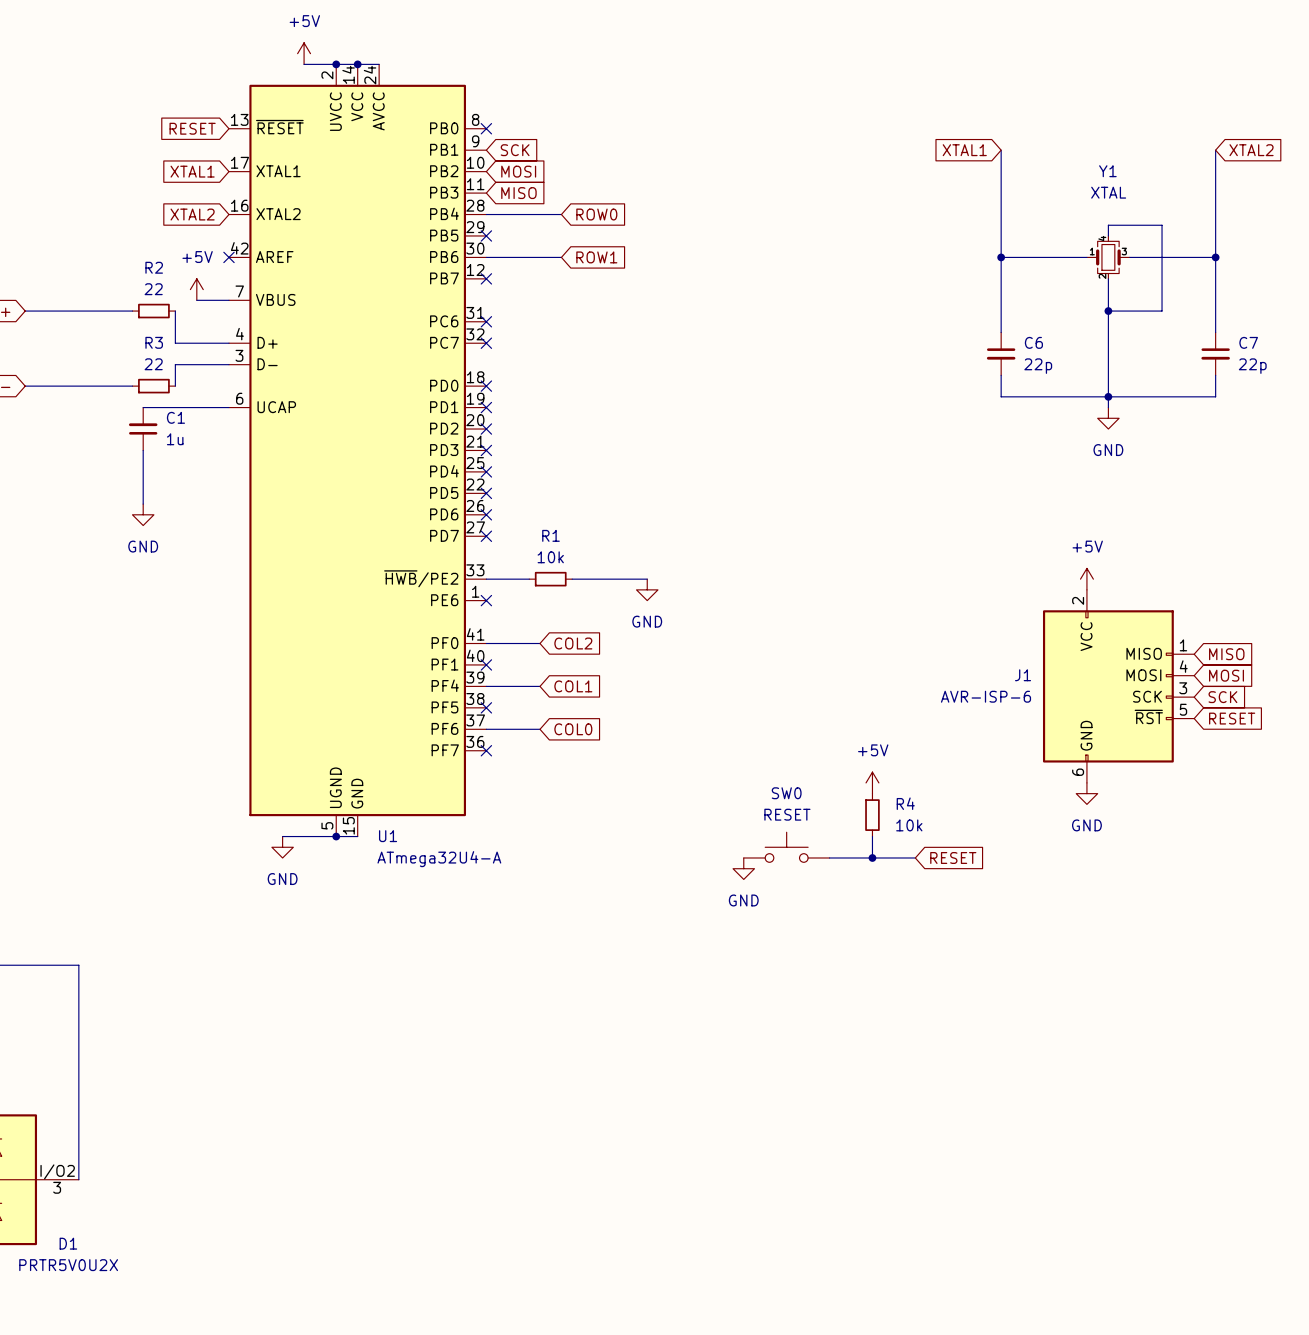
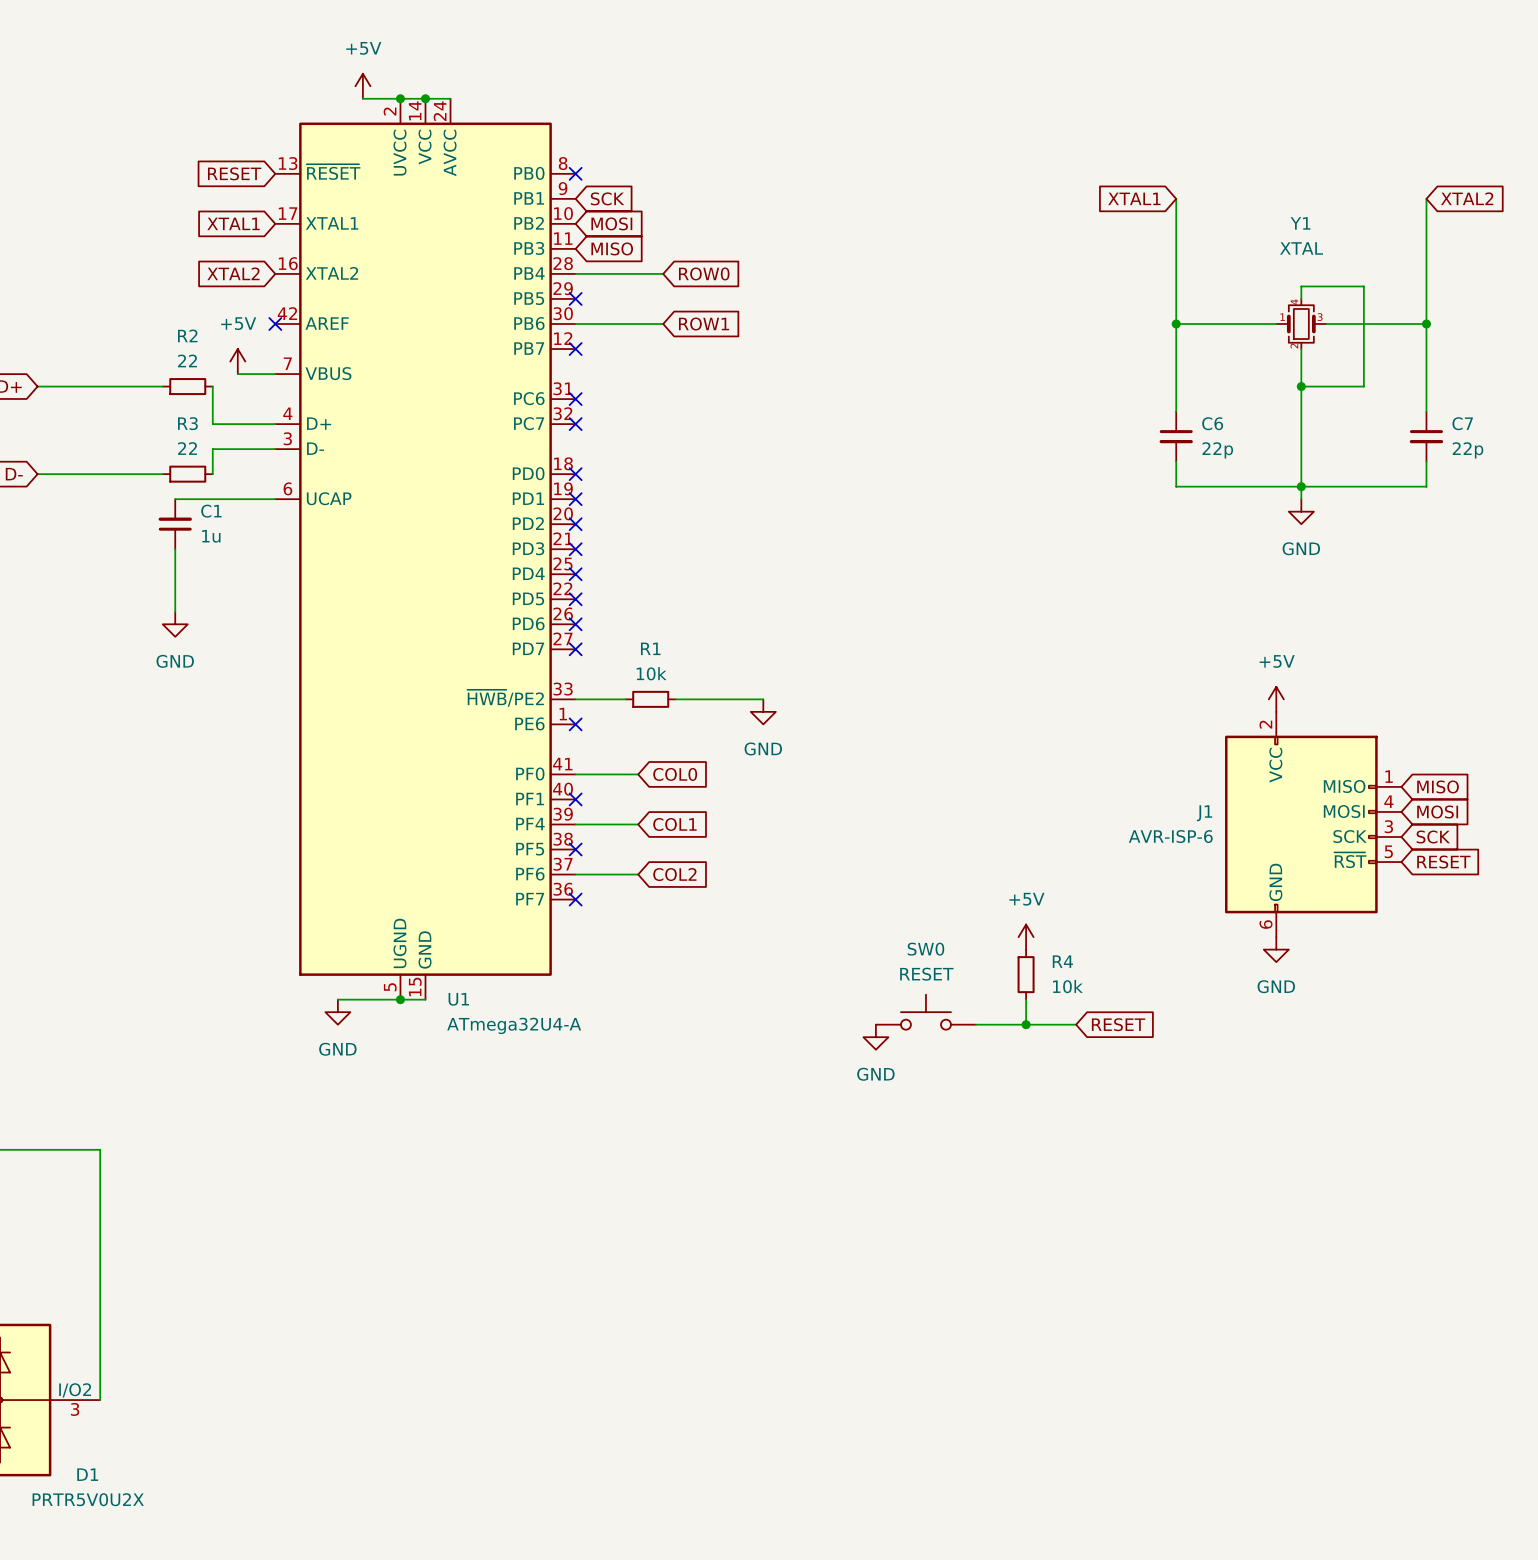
global label: COL2 (573, 643) -> COL0 (675, 774)
global label: COL0 (573, 729) -> COL2 (674, 874)

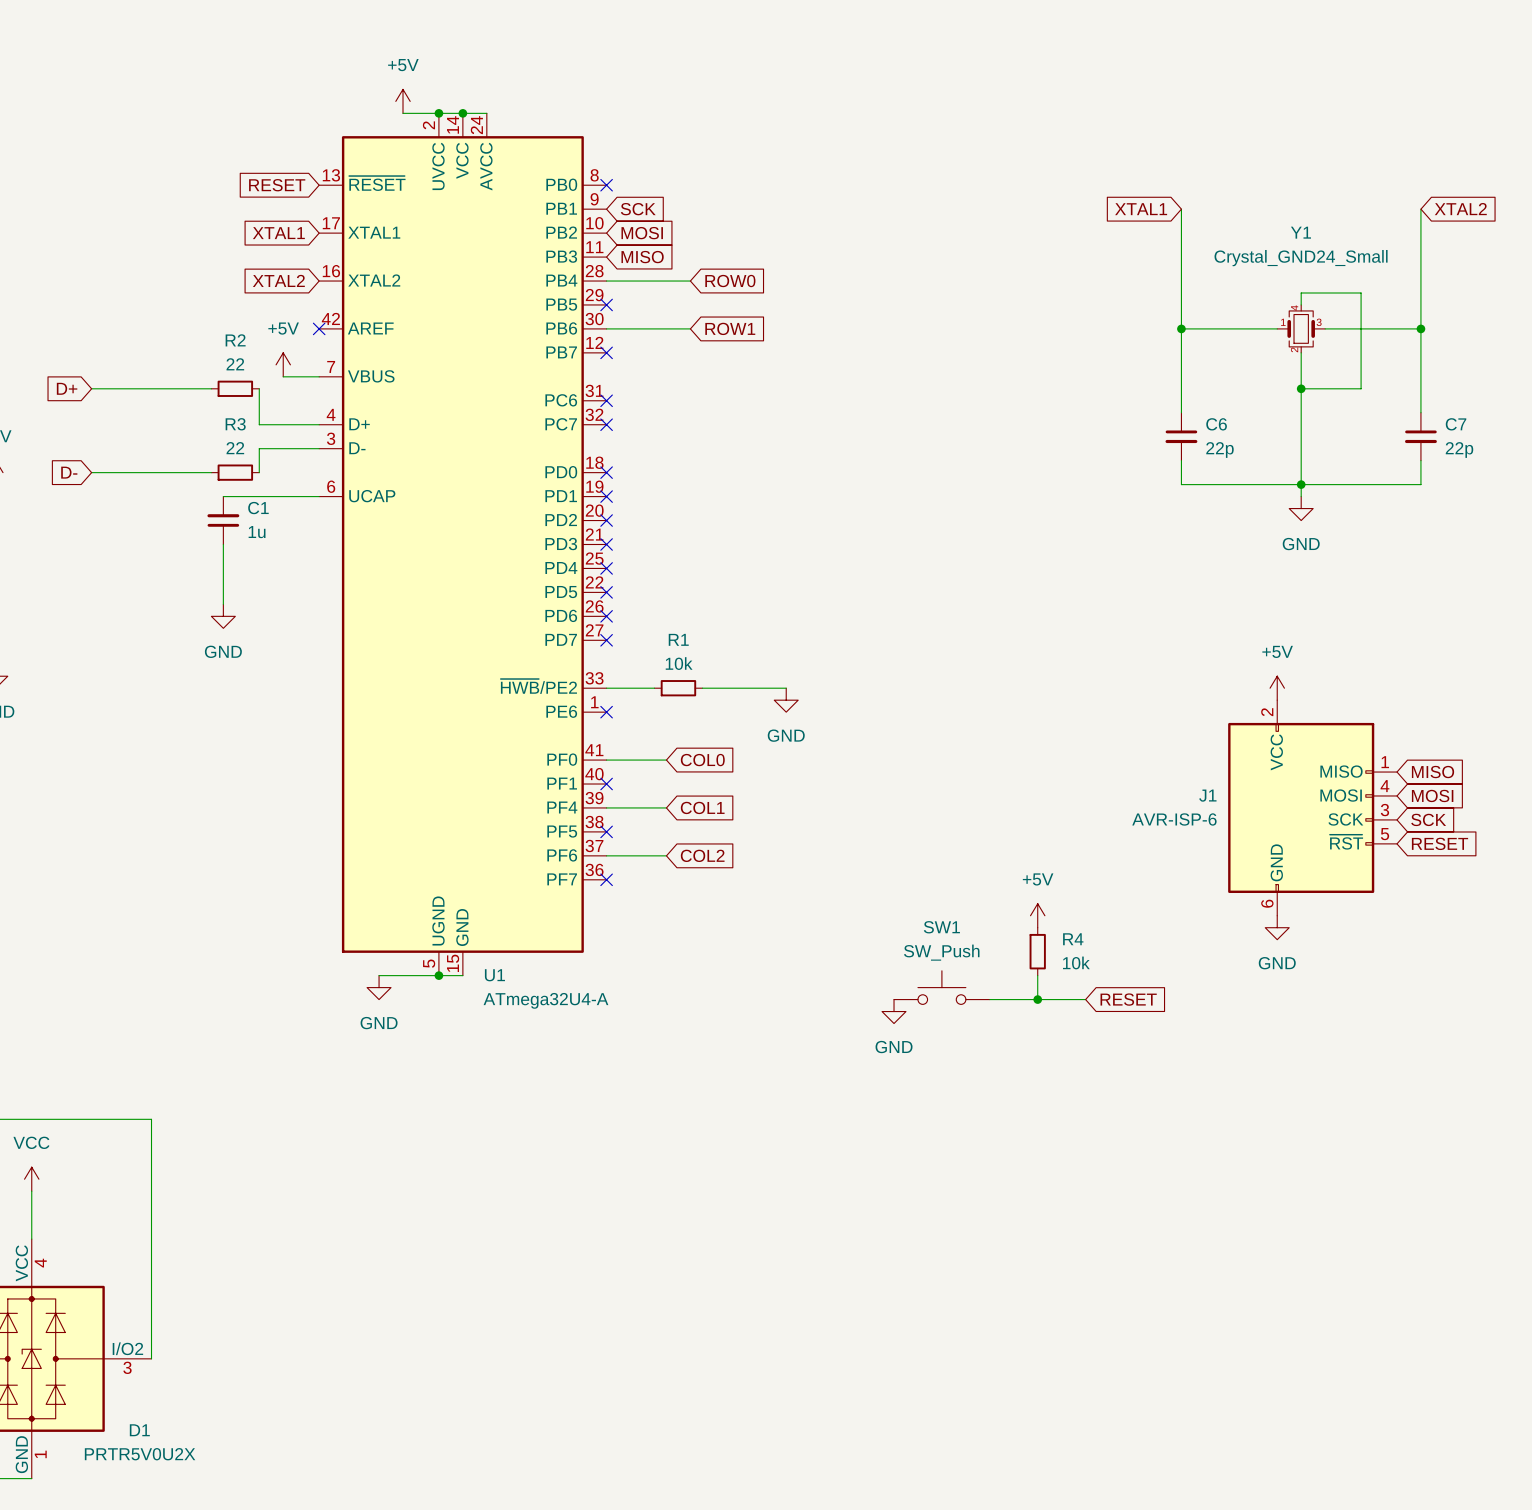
Y1 value: XTAL (1301, 248) -> Crystal_GND24_Small (1301, 258)
SW0 name: SW0 (925, 949) -> SW1 (941, 927)
SW0 value: RESET (926, 974) -> SW_Push (941, 952)

